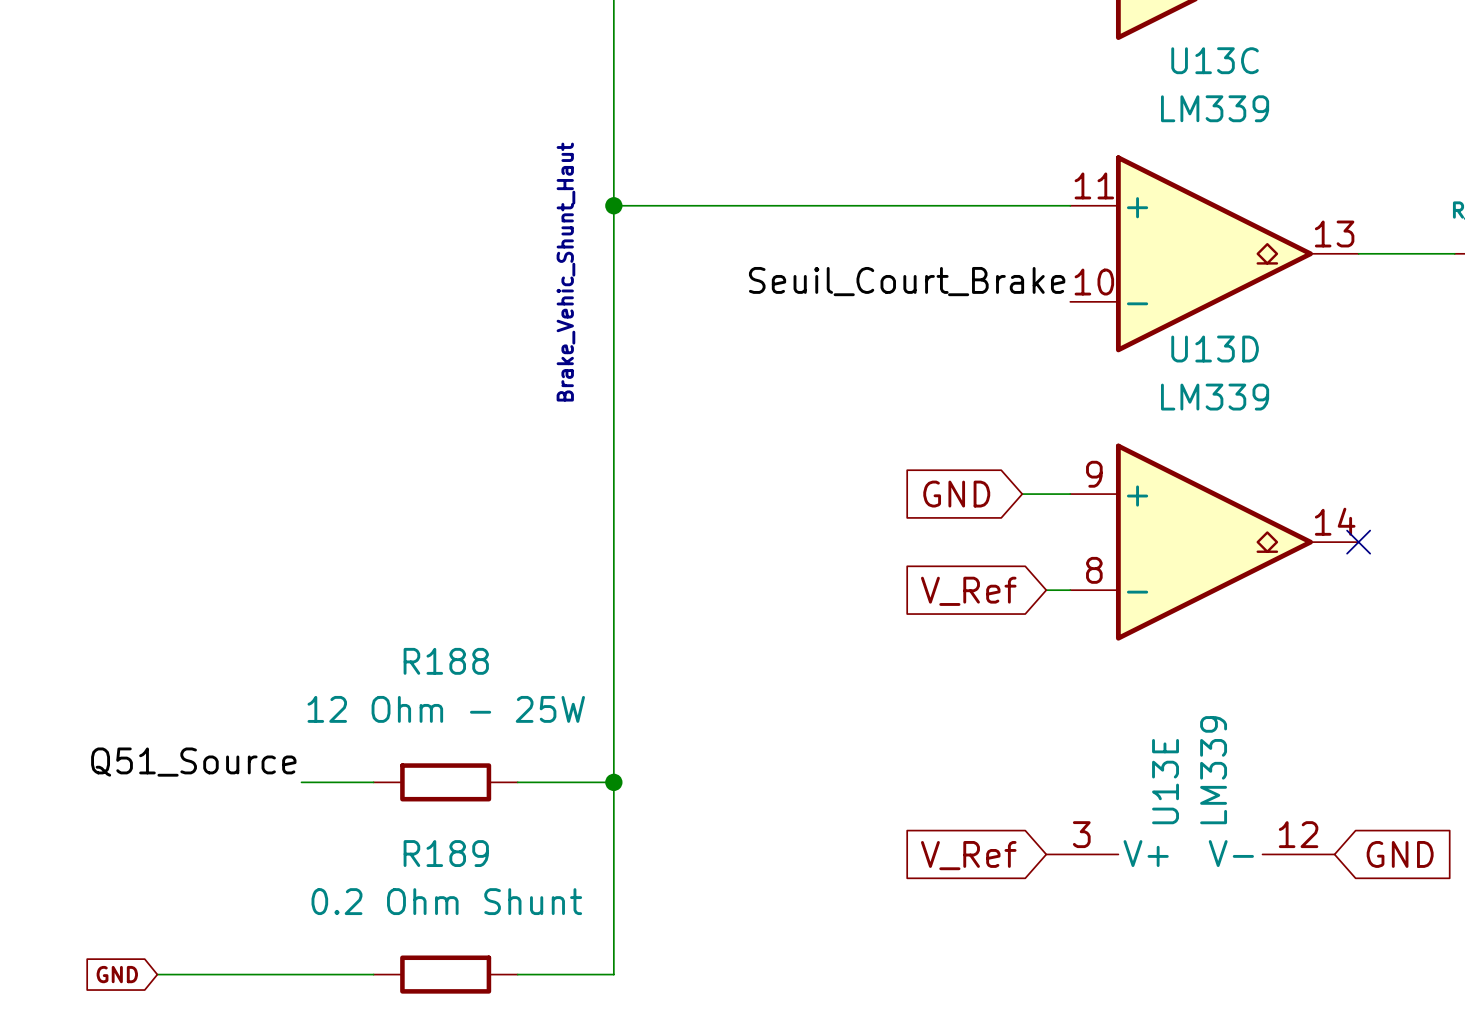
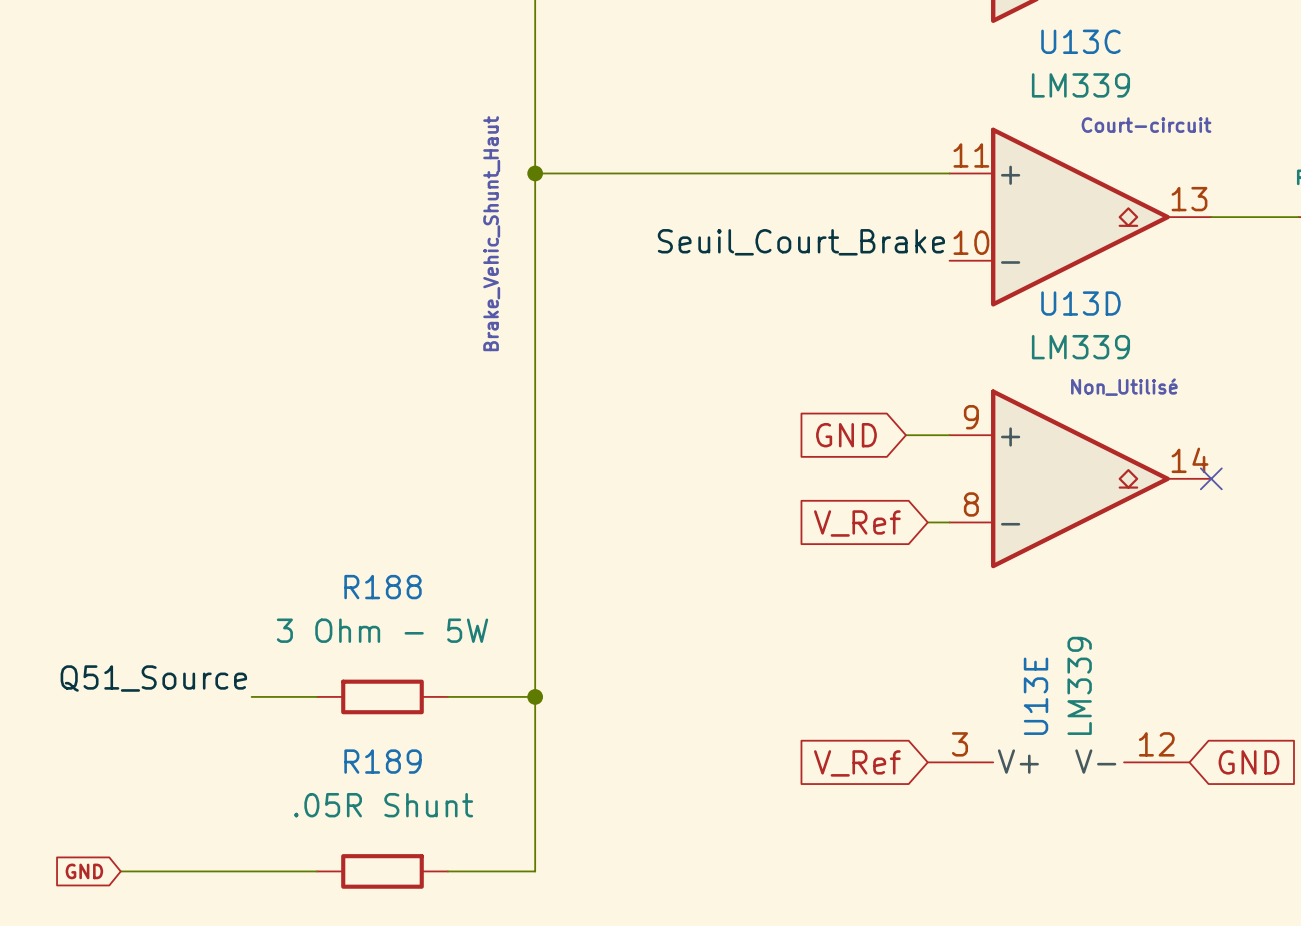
text: none -> Court-circuit (1146, 125)
text: none -> Non_Utilisé (1124, 387)
R188 value: 12 Ohm - 25W (446, 709) -> 3 Ohm - 5W (382, 630)
R189 value: 0.2 Ohm Shunt (446, 901) -> .05R Shunt (383, 805)

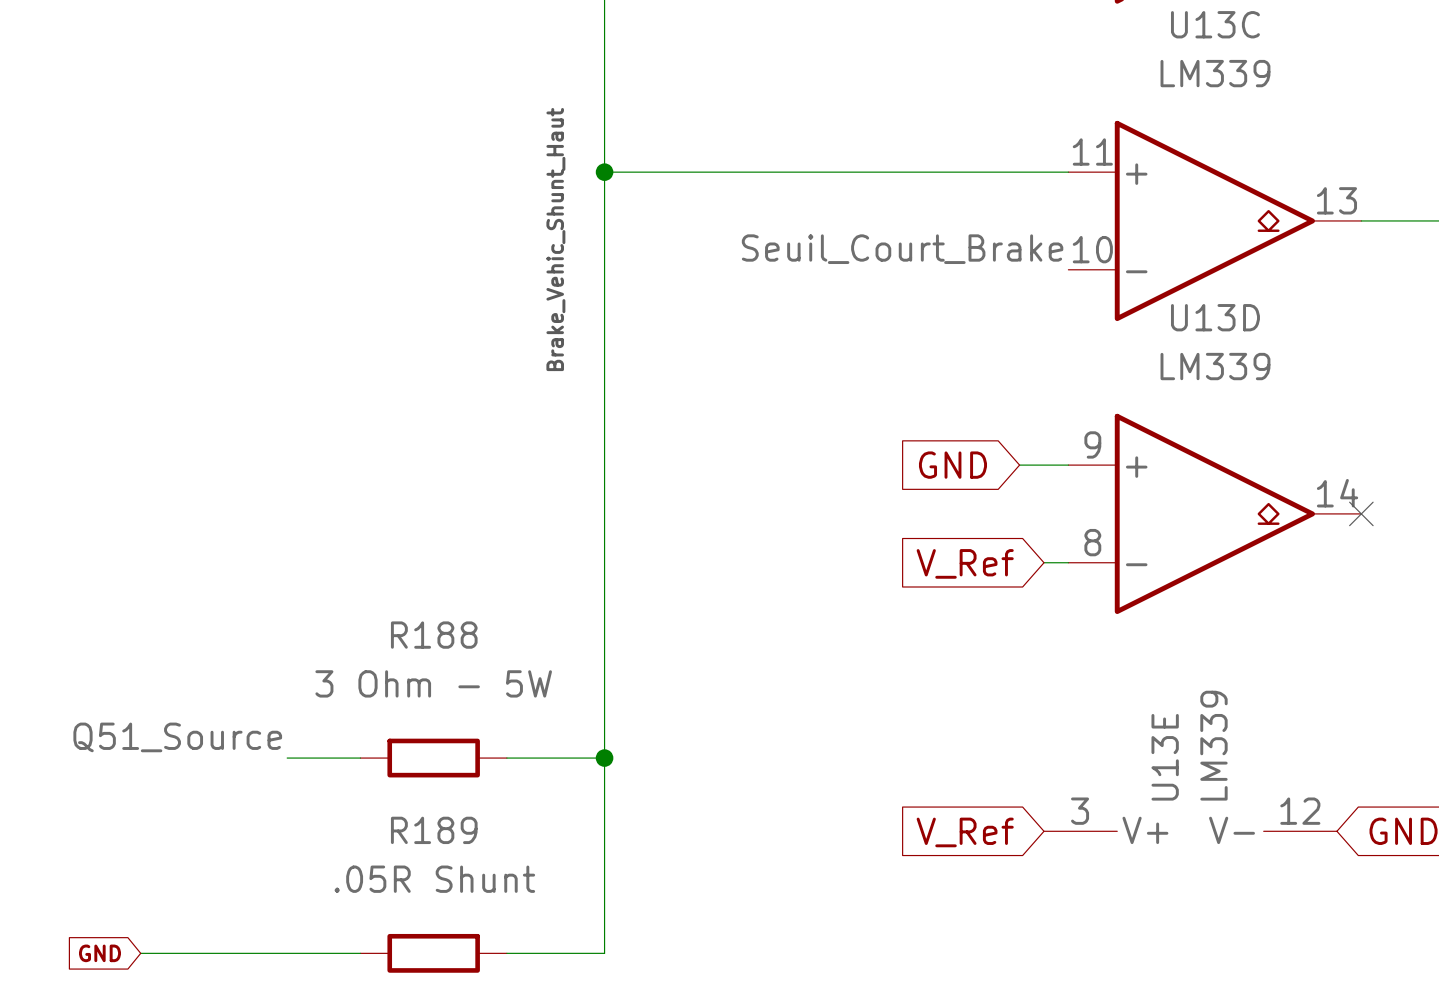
text: Court-circuit (1146, 125) -> none
text: Non_Utilisé (1124, 387) -> none

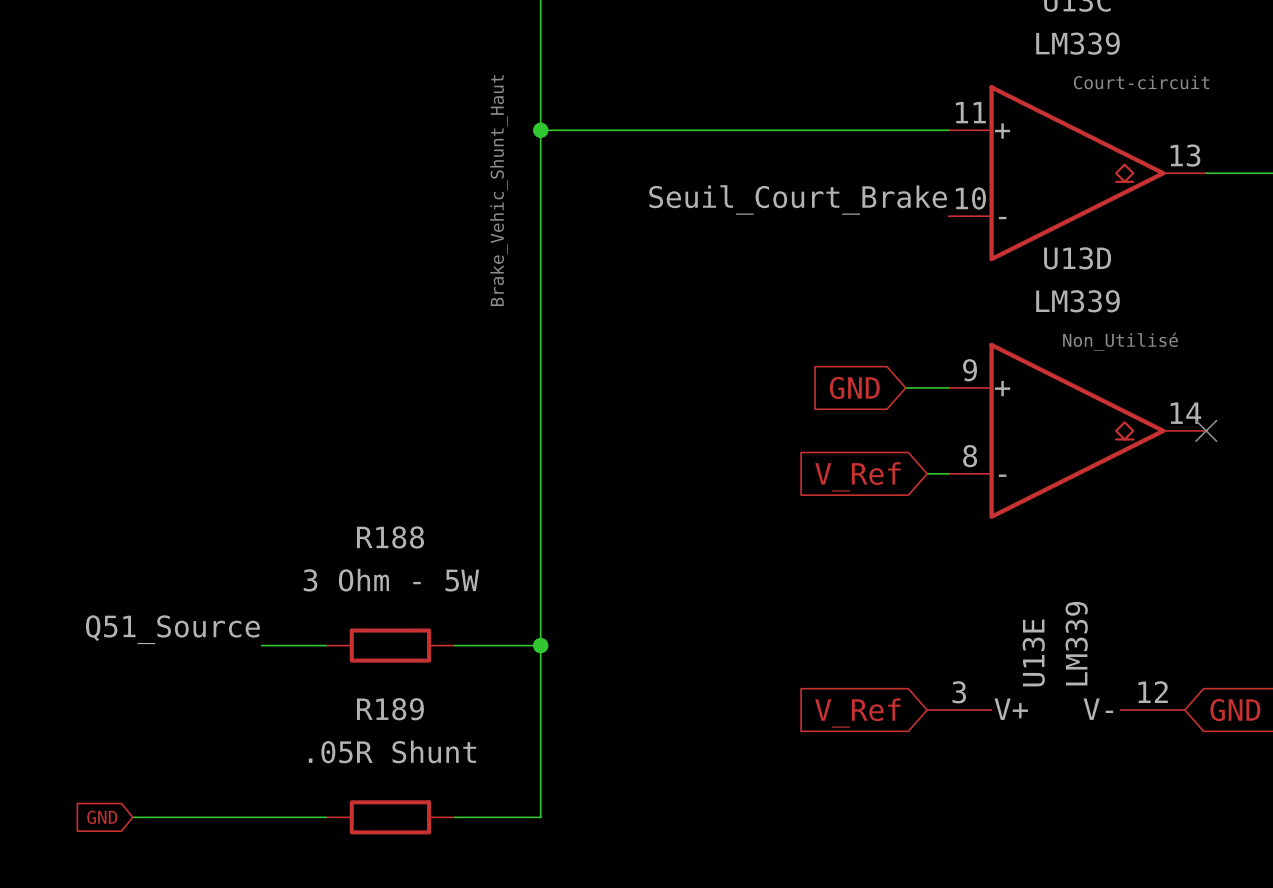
text: none -> Court-circuit (1141, 82)
text: none -> Non_Utilisé (1120, 341)

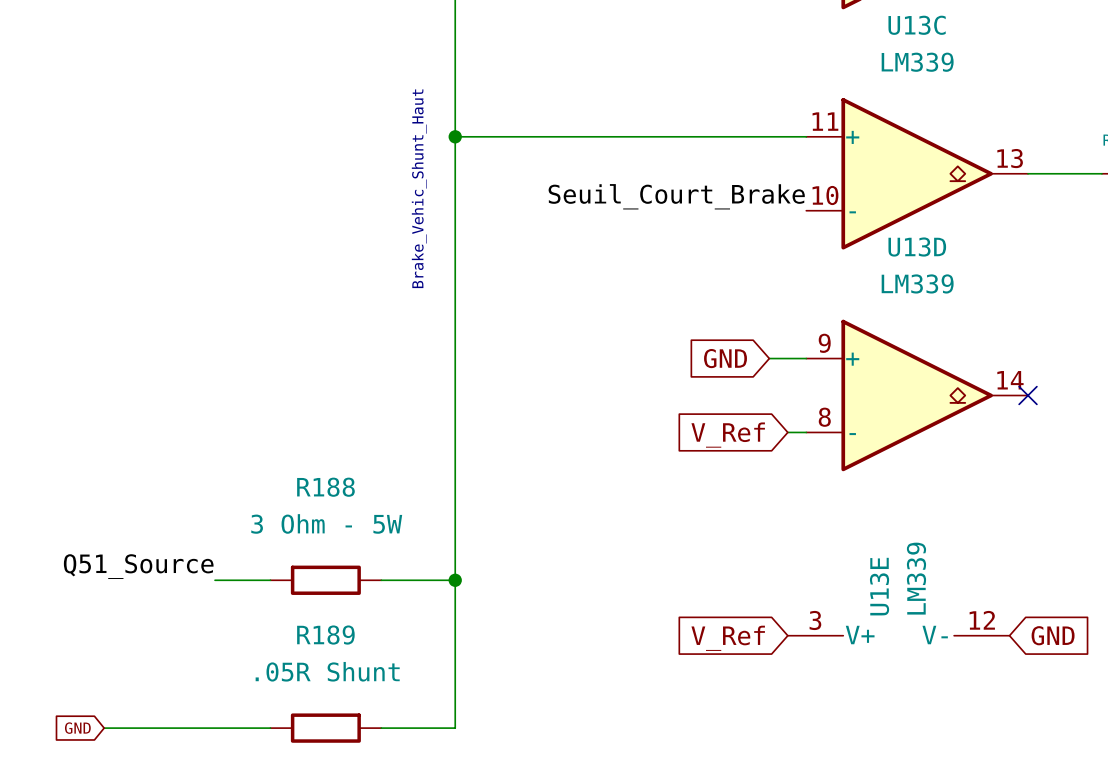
text: Court-circuit (1141, 82) -> none
text: Non_Utilisé (1120, 341) -> none

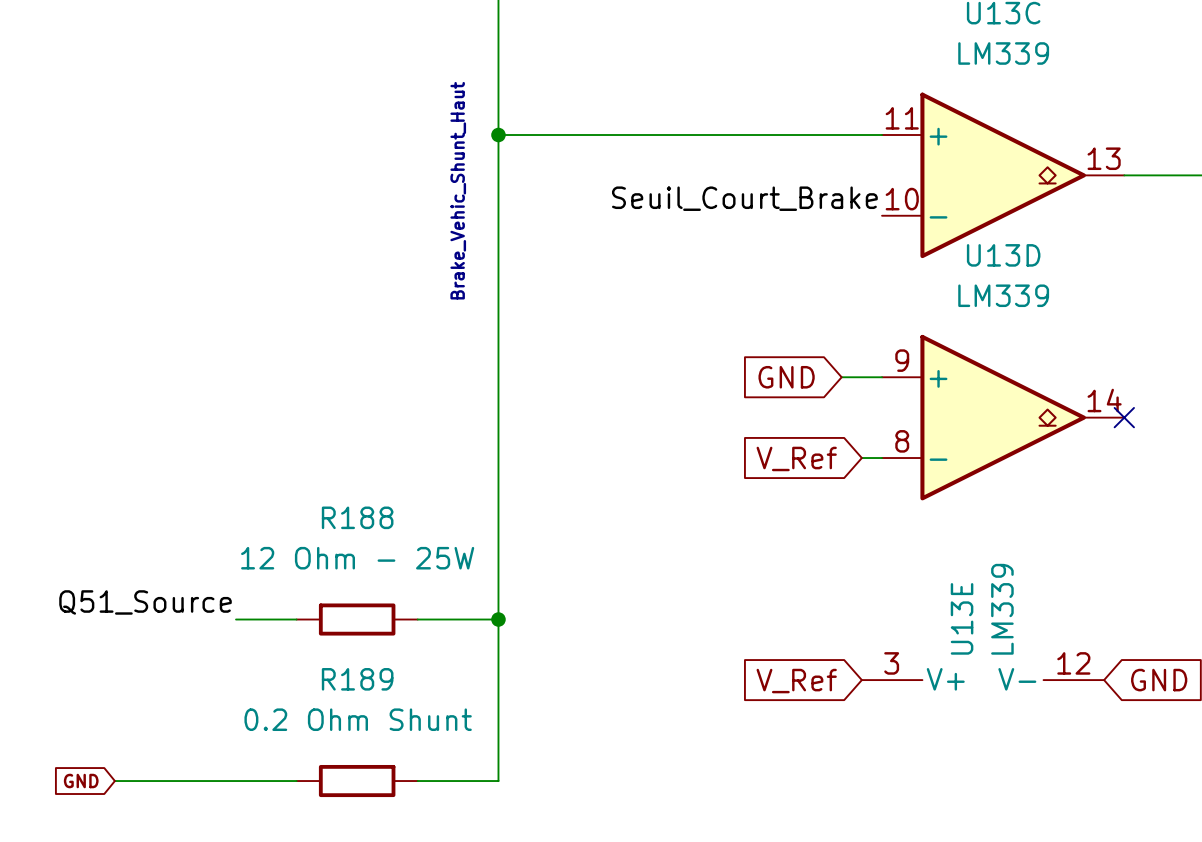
R188 value: 3 Ohm - 5W (326, 523) -> 12 Ohm - 25W (357, 558)
R189 value: .05R Shunt (327, 671) -> 0.2 Ohm Shunt (358, 719)

